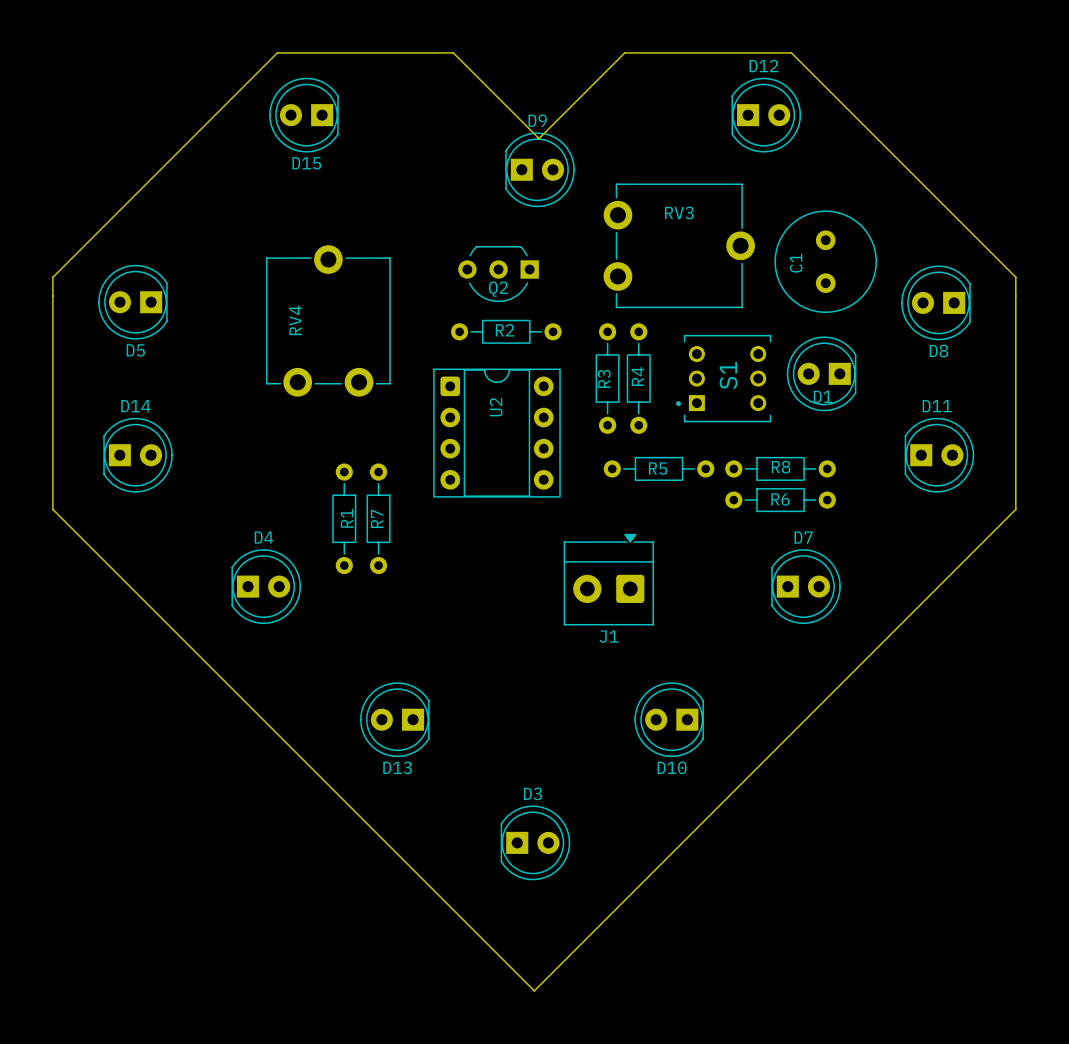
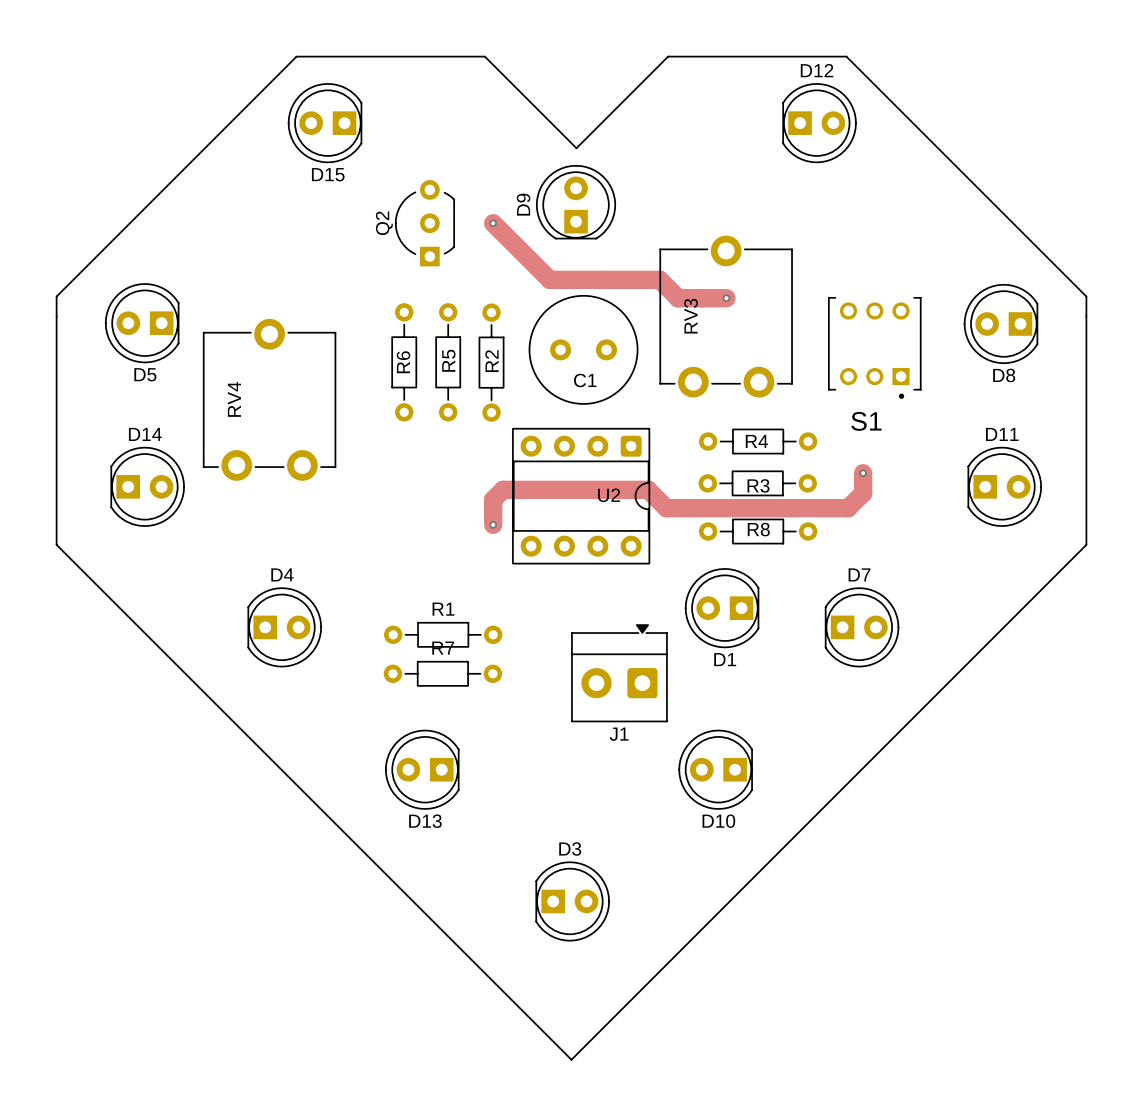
D9 rotation: 0° (540, 169) -> 90° counterclockwise (576, 202)
track: none -> (493, 223) (549, 279) (659, 279) (678, 298) (726, 298)
via: none -> (493, 223)
RV3 rotation: 0° (679, 245) -> 90° counterclockwise (726, 316)
C1 rotation: 0° (825, 261) -> 90° clockwise (583, 349)
C1 position: (825, 261) -> (583, 349)
C1 name position: C1 (796, 263) -> C1 (585, 380)
Q2 rotation: 0° (498, 274) -> 90° clockwise (424, 223)
Q2 position: (498, 274) -> (424, 223)
via: none -> (726, 298)
Q2 name position: Q2 (498, 289) -> Q2 (384, 223)
RV4 position: (328, 320) -> (269, 399)
R2 rotation: 0° (506, 331) -> 90° clockwise (491, 362)
D1 position: (821, 373) -> (722, 608)
S1 name position: S1 (728, 375) -> S1 (866, 421)
R3 rotation: 0° (607, 378) -> 90° clockwise (757, 483)
R3 position: (607, 378) -> (757, 483)
R4 rotation: 0° (638, 378) -> 90° clockwise (758, 441)
R4 position: (638, 378) -> (758, 441)
S1 rotation: 0° (723, 378) -> 90° counterclockwise (874, 347)
S1 position: (723, 378) -> (874, 347)
D1 name position: D1 (823, 396) -> D1 (725, 659)
U2 rotation: 0° (496, 433) -> 90° clockwise (581, 496)
track: none -> (863, 473) (863, 493) (848, 508) (666, 508) (648, 489) (503, 489) (493, 499) (493, 524)
via: none -> (863, 473)
R5 rotation: 0° (659, 468) -> 90° clockwise (448, 362)
R5 position: (659, 468) -> (448, 362)
R8 position: (780, 468) -> (758, 531)
via: none -> (493, 524)
R6 rotation: 0° (780, 500) -> 90° clockwise (404, 362)
R6 position: (780, 500) -> (404, 362)
R1 rotation: 0° (344, 518) -> 90° clockwise (443, 634)
R1 position: (344, 518) -> (443, 634)
R7 rotation: 0° (378, 518) -> 90° clockwise (442, 673)
R7 position: (378, 518) -> (442, 673)
J1 position: (608, 579) -> (619, 673)

